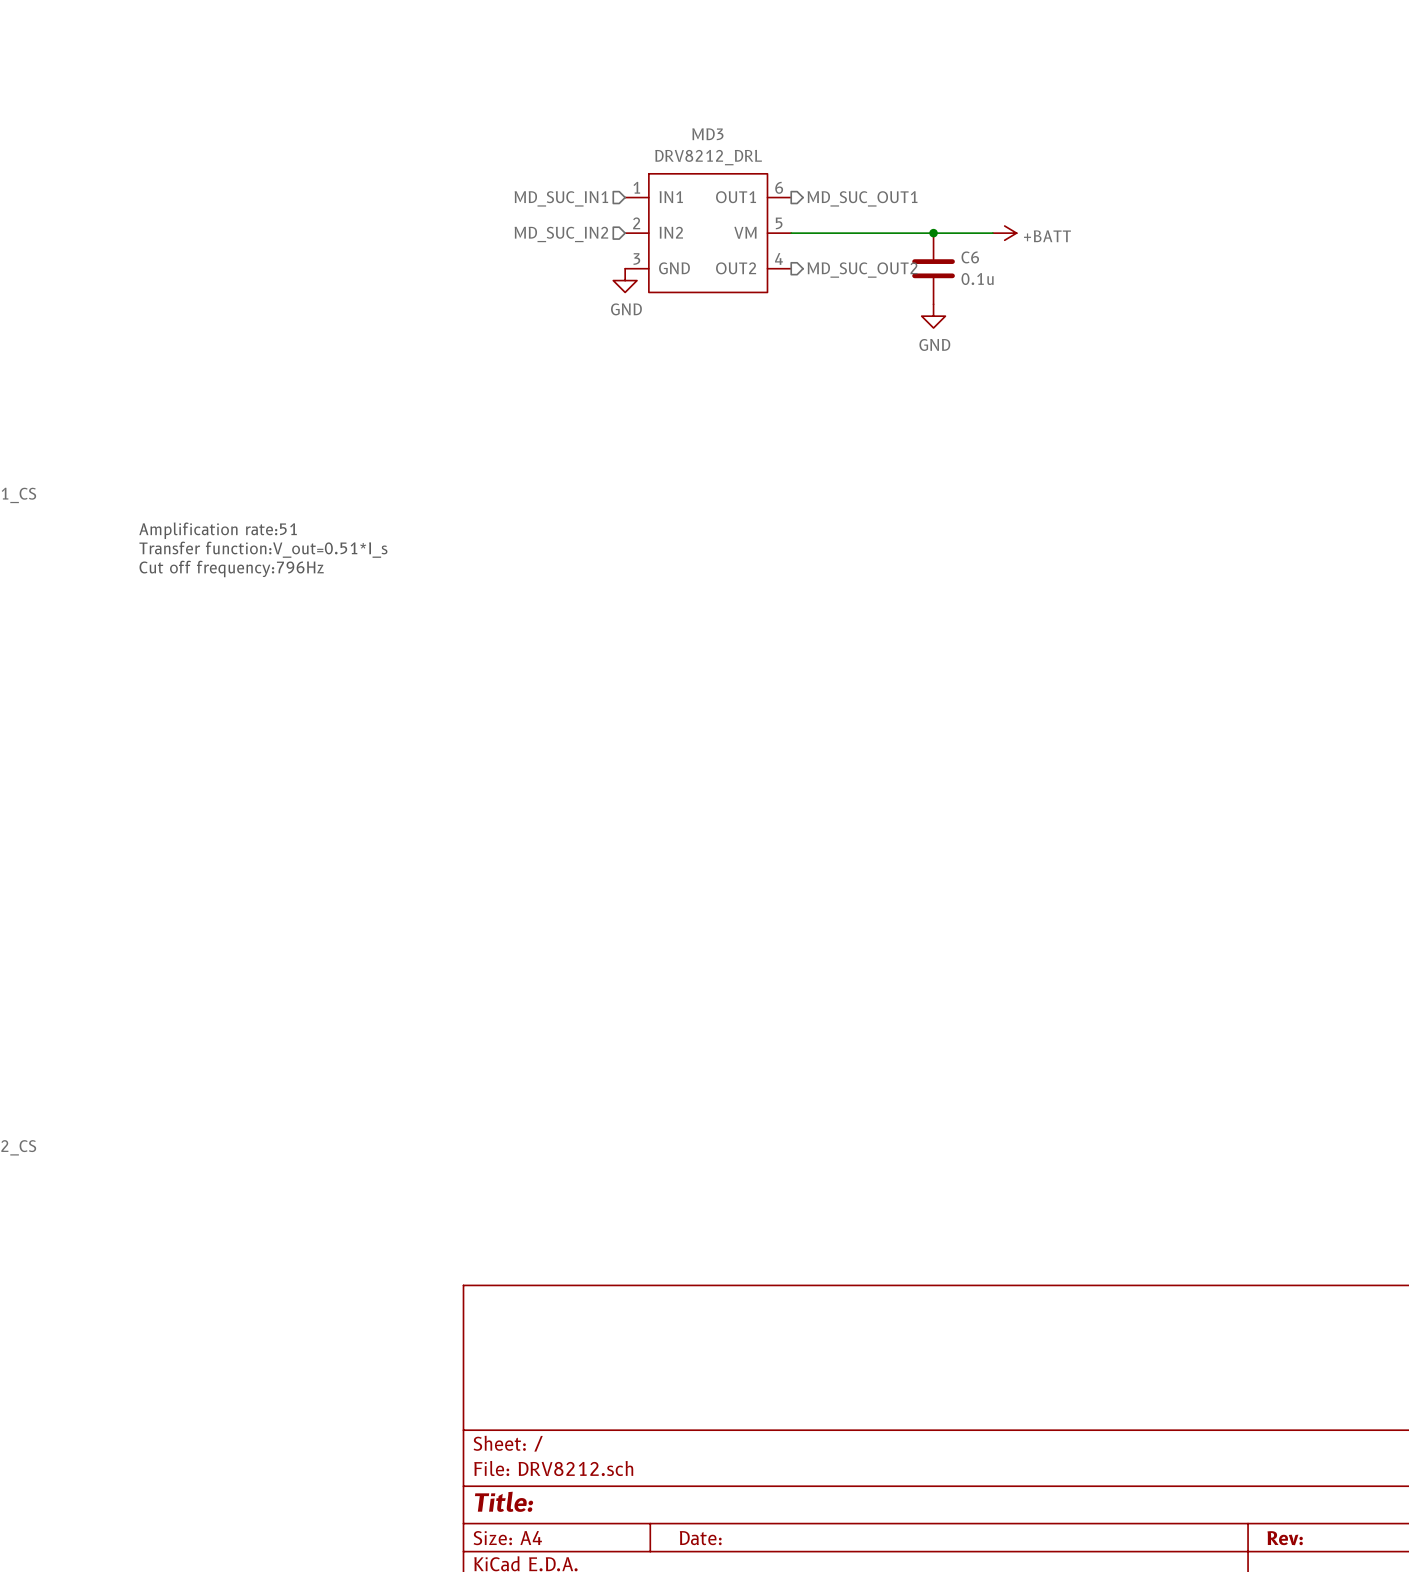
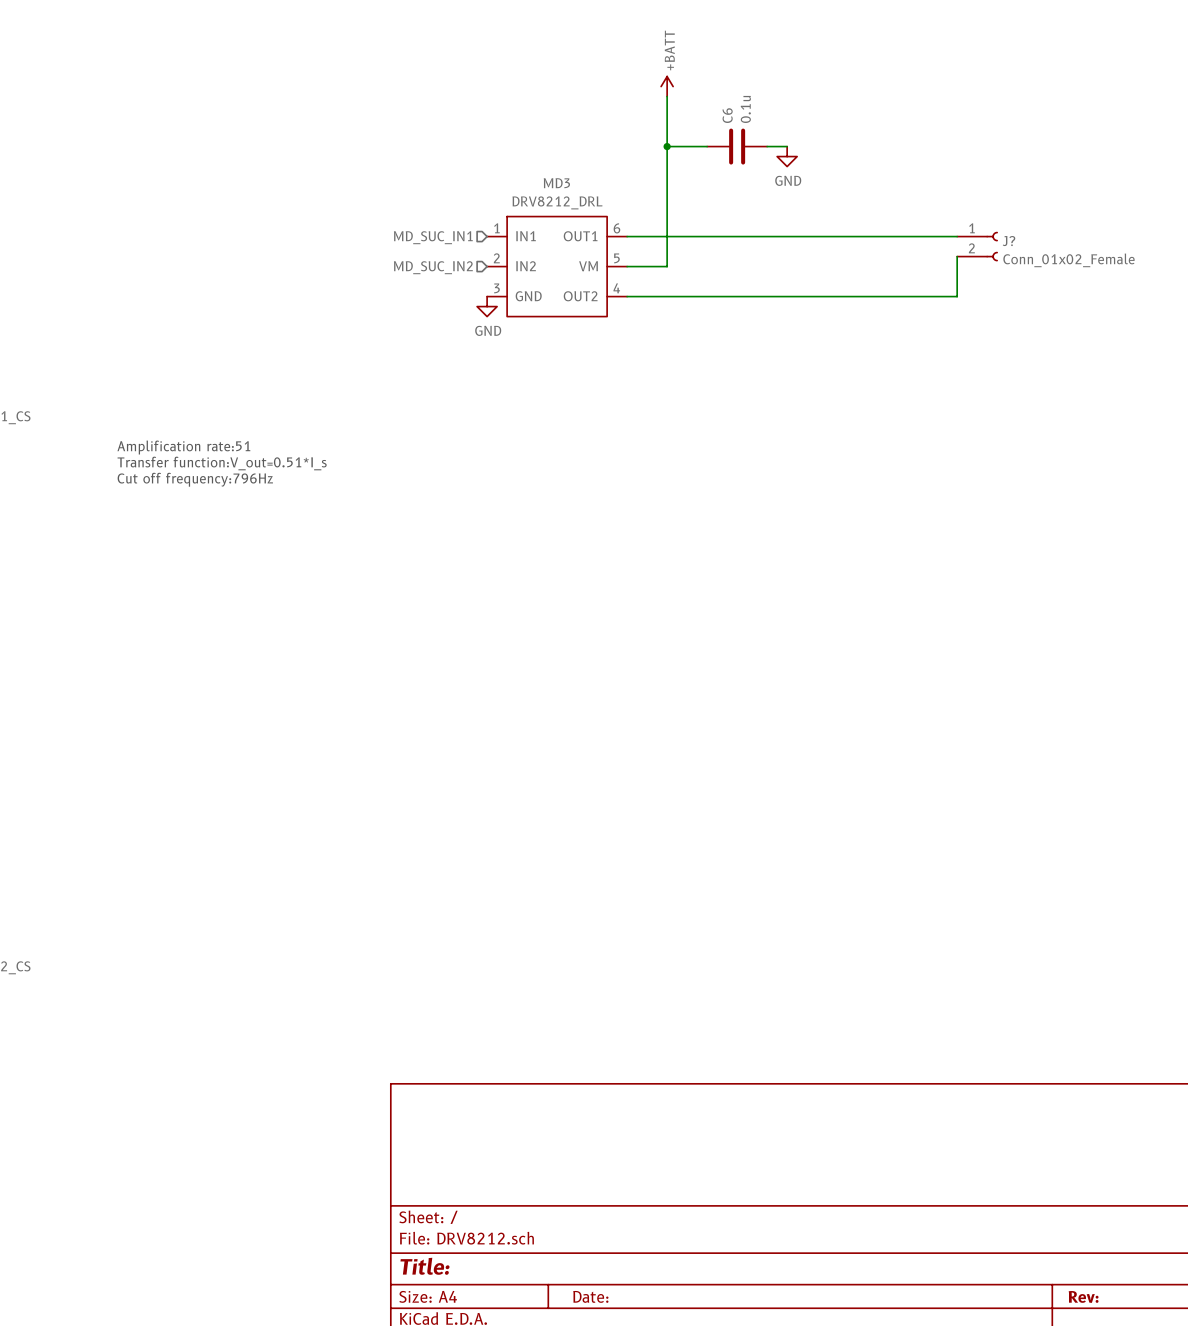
power symbol: none -> +BATT (667, 86)
wire: none -> (667, 96) (667, 266) (627, 266)
wire: none -> (667, 146) (707, 146)
junction: none -> (667, 146)
wire: none -> (767, 146) (787, 146)
hierarchical label position: MD_SUC_IN1 (561, 198) -> MD_SUC_IN1 (433, 237)
hierarchical label: MD_SUC_OUT1 (862, 198) -> none
MD3 position: (708, 233) -> (557, 266)
wire: (791, 233) (992, 233) -> none
junction: (933, 233) -> none
power symbol: +BATT (1004, 233) -> none
hierarchical label position: MD_SUC_IN2 (561, 234) -> MD_SUC_IN2 (433, 267)
C6 name position: C6 (970, 257) -> C6 (727, 115)
C6 rotation: 0° (933, 268) -> 90° clockwise (737, 146)
C6 position: (933, 268) -> (737, 146)
hierarchical label: MD_SUC_OUT2 (862, 270) -> none
C6 value position: 0.1u (977, 279) -> 0.1u (745, 109)
power symbol position: GND (625, 280) -> GND (487, 306)
wire: none -> (627, 236) (957, 236)
J?: none -> Conn_01x02_Female (977, 246)
wire: none -> (957, 256) (957, 296) (627, 296)
power symbol position: GND (933, 316) -> GND (787, 156)

